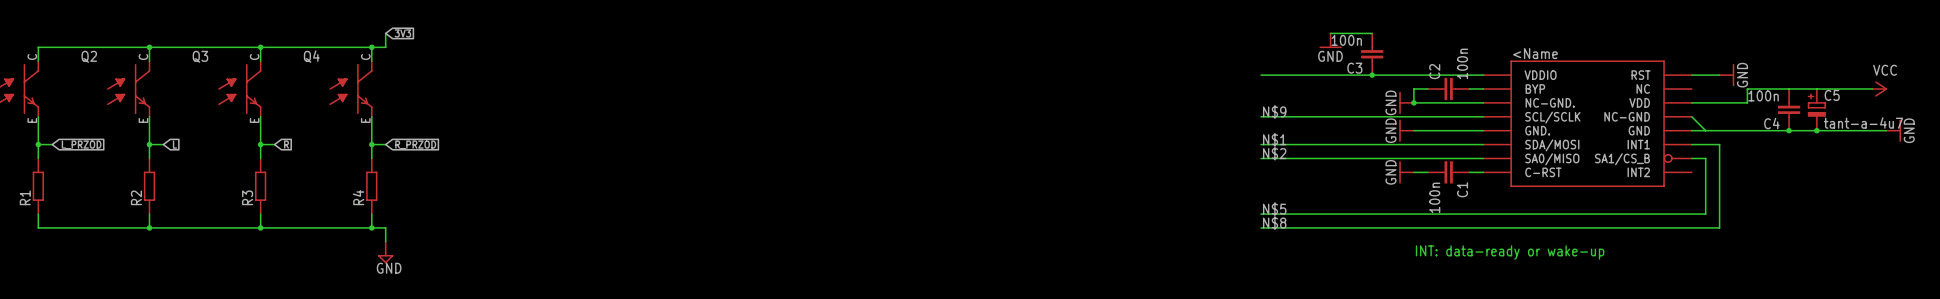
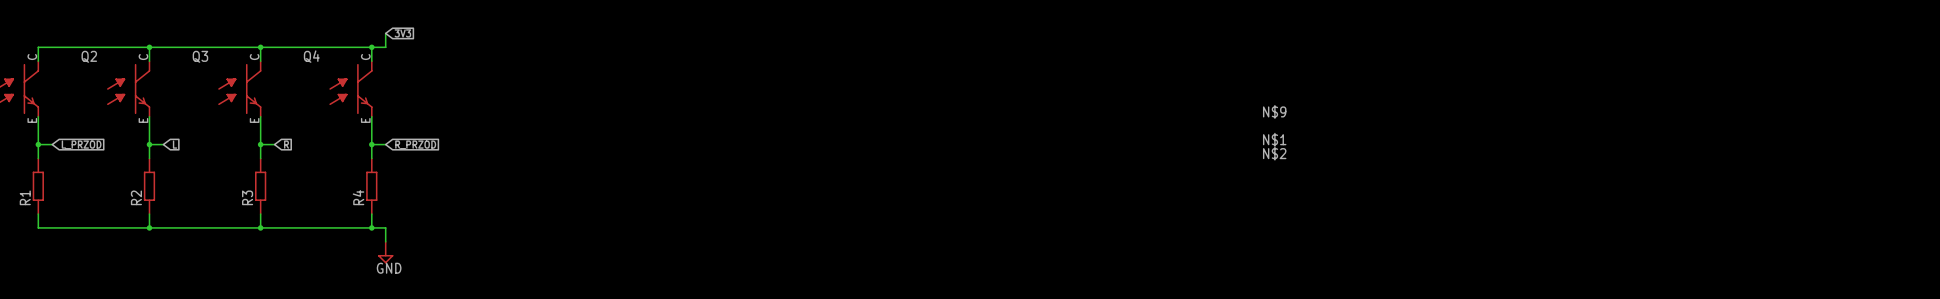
wire: (1330, 33) (1372, 33) -> none
power symbol: GND (1330, 40) -> none
C3: 100n (1372, 54) -> none
wire: (1261, 75) (1483, 75) -> none
junction: (1372, 75) -> none
wire: (1691, 75) (1719, 75) -> none
power symbol: GND (1726, 75) -> none
wire: (1427, 89) (1413, 89) (1413, 102) (1483, 102) -> none
C2: 100n (1448, 89) -> none
wire: (1469, 89) (1483, 89) -> none
wire: (1872, 89) (1747, 89) (1747, 102) (1691, 102) -> none
power symbol: VCC (1879, 89) -> none
power symbol: GND (1406, 102) -> none
junction: (1413, 102) -> none
C4: 100n (1789, 109) -> none
C5: tant-a-4u7 (1816, 109) -> none
wire: (1261, 116) (1483, 116) -> none
wire: (1691, 116) (1705, 130) -> none
part: (1587, 123) -> none
power symbol: GND (1406, 130) -> none
wire: (1413, 130) (1483, 130) -> none
wire: (1691, 130) (1886, 130) -> none
junction: (1789, 130) -> none
junction: (1816, 130) -> none
power symbol: GND (1893, 130) -> none
wire: (1261, 144) (1483, 144) -> none
wire: (1691, 144) (1719, 144) (1719, 227) (1261, 227) -> none
wire: (1261, 158) (1483, 158) -> none
wire: (1691, 158) (1705, 158) (1705, 214) (1261, 214) -> none
power symbol: GND (1406, 172) -> none
wire: (1413, 172) (1427, 172) -> none
C1: 100n (1448, 172) -> none
wire: (1469, 172) (1483, 172) -> none
label: N$5 (1274, 209) -> none
label: N$8 (1274, 223) -> none
text: INT: data-ready or wake-up (1510, 252) -> none

